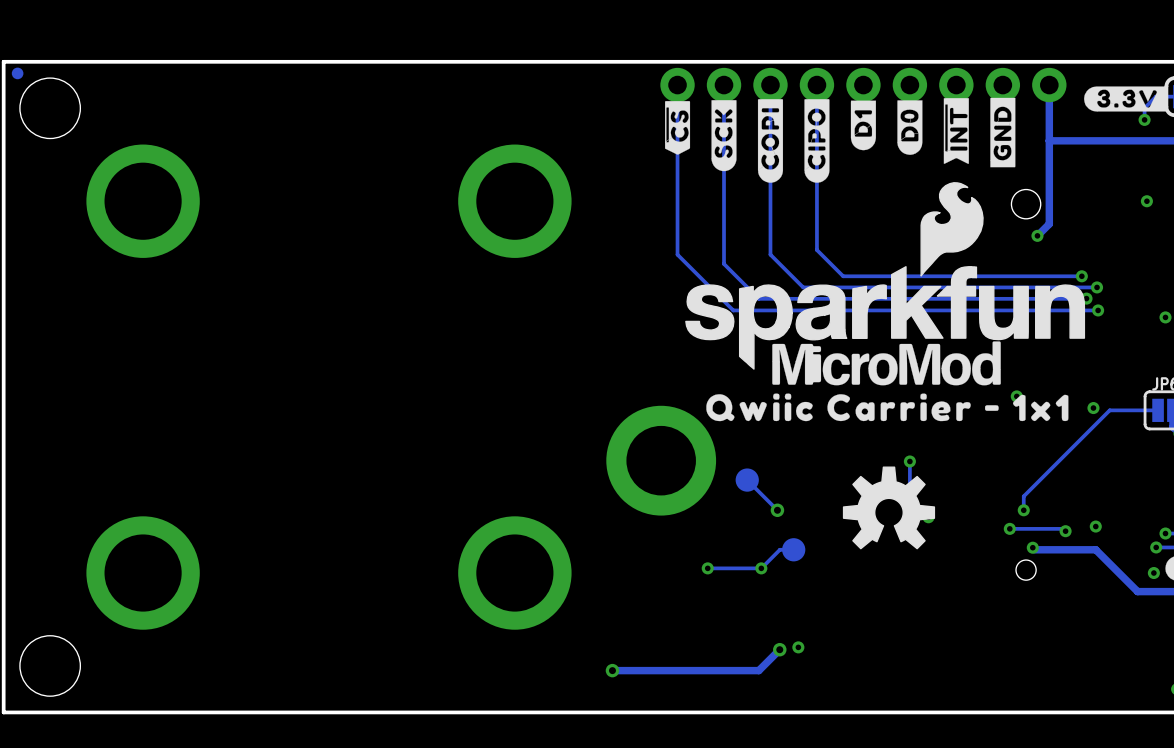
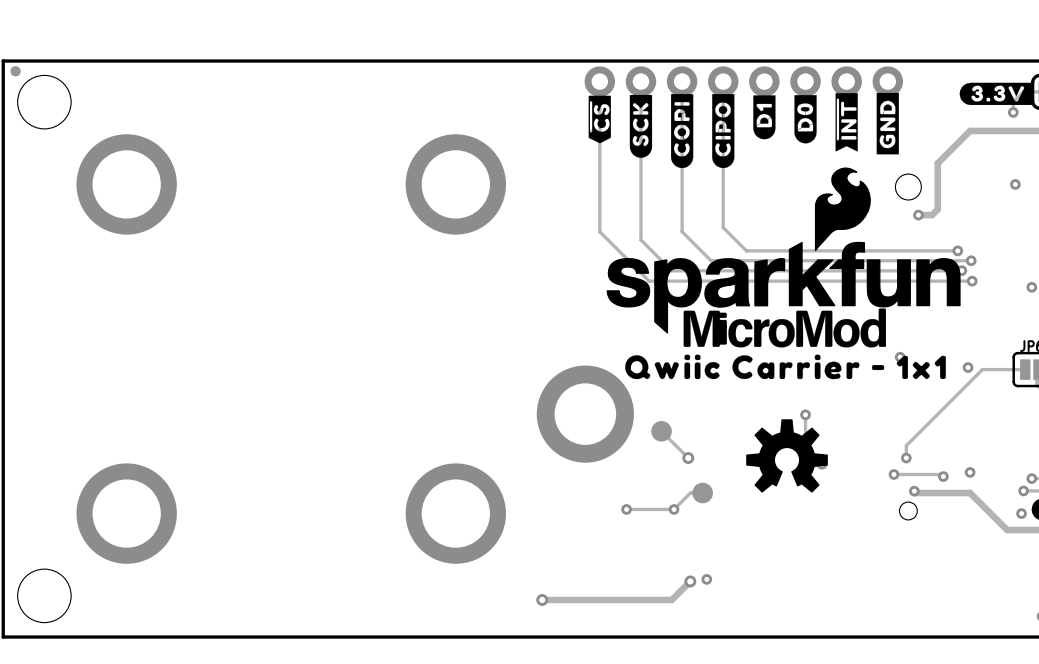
part: (863, 85) -> none
track: (1049, 85) (1049, 224) (1037, 235) -> (970, 130) (937, 163) (937, 209) (932, 215) (918, 215)
track: (1095, 140) (1049, 140) -> none

